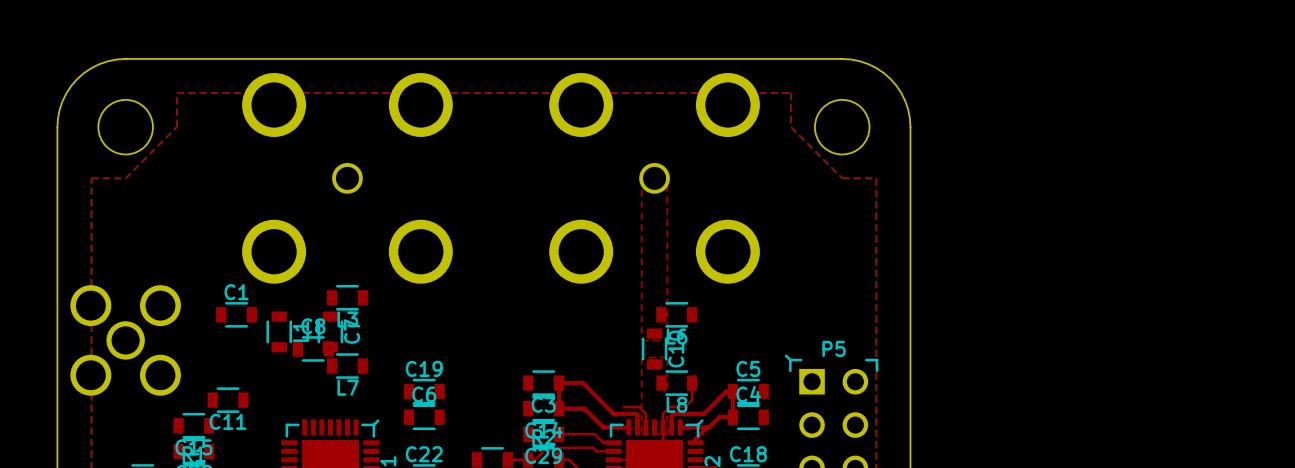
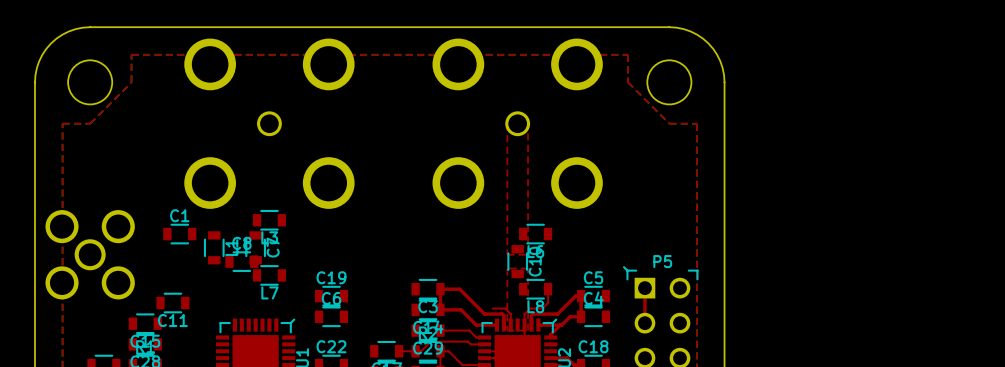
top track: none -> (644, 288) (644, 323)

